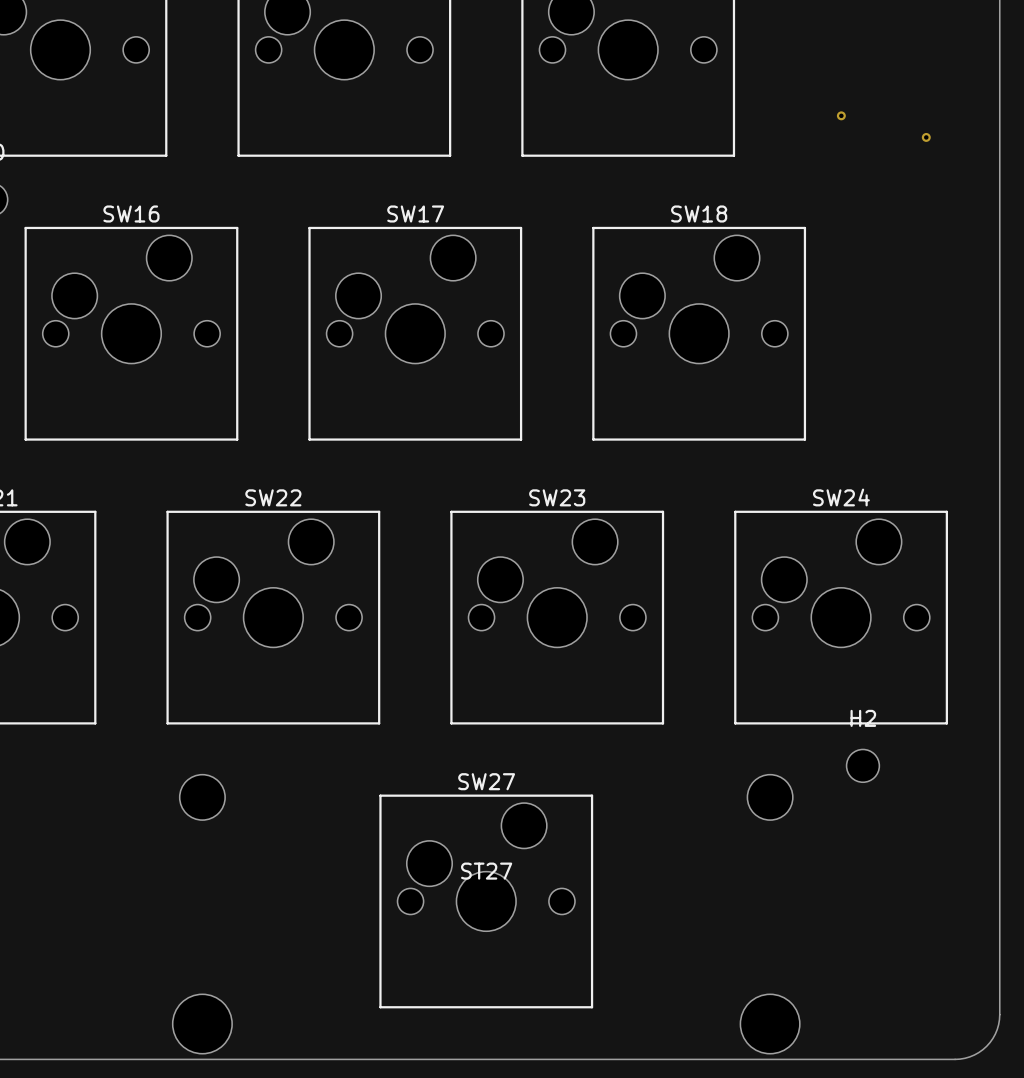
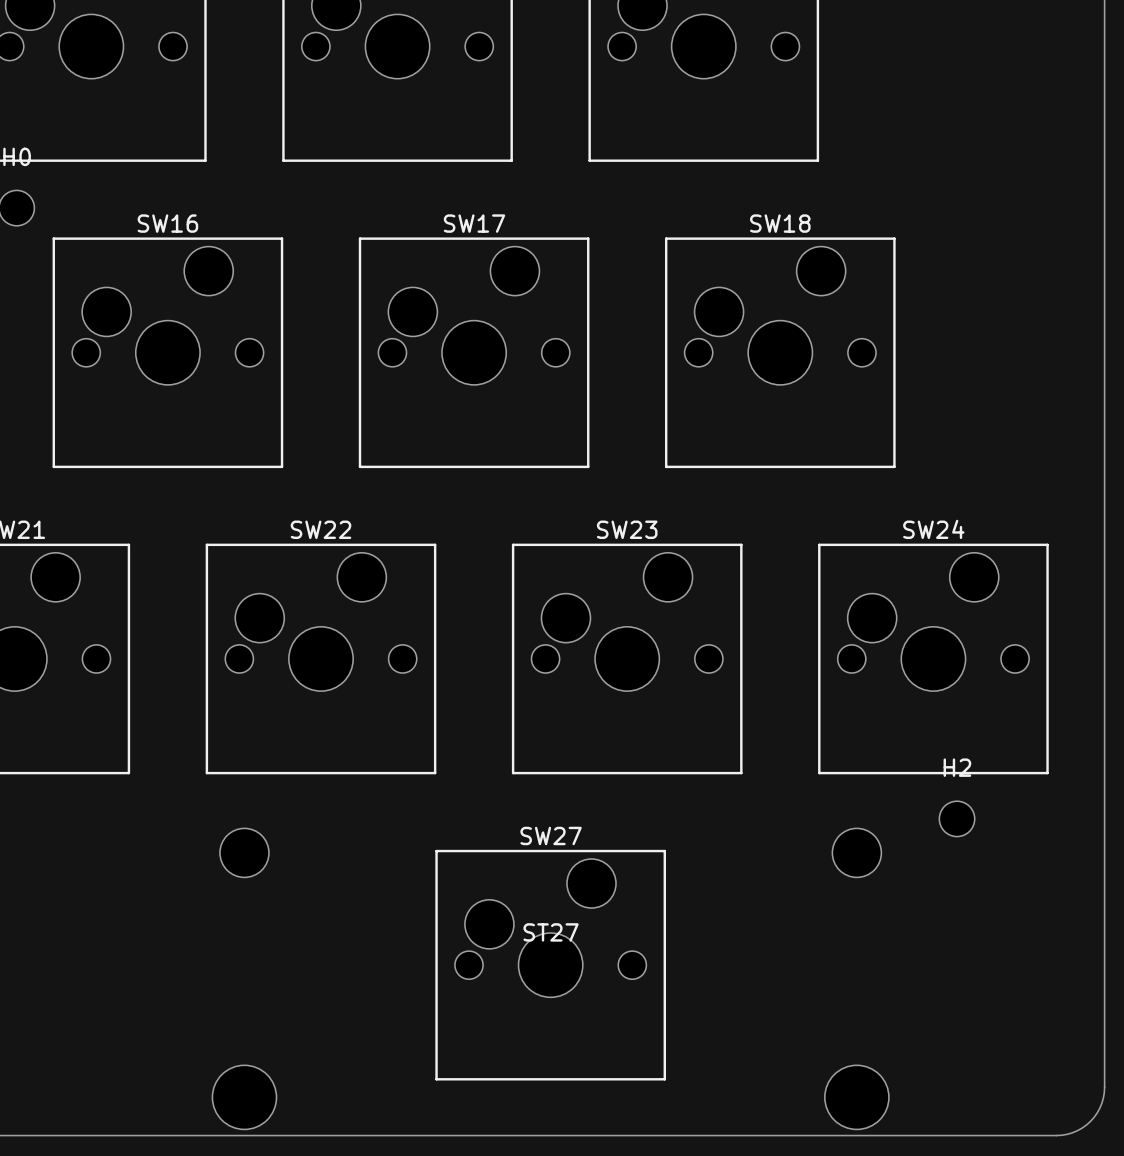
via: (841, 115) -> none
via: (926, 137) -> none

